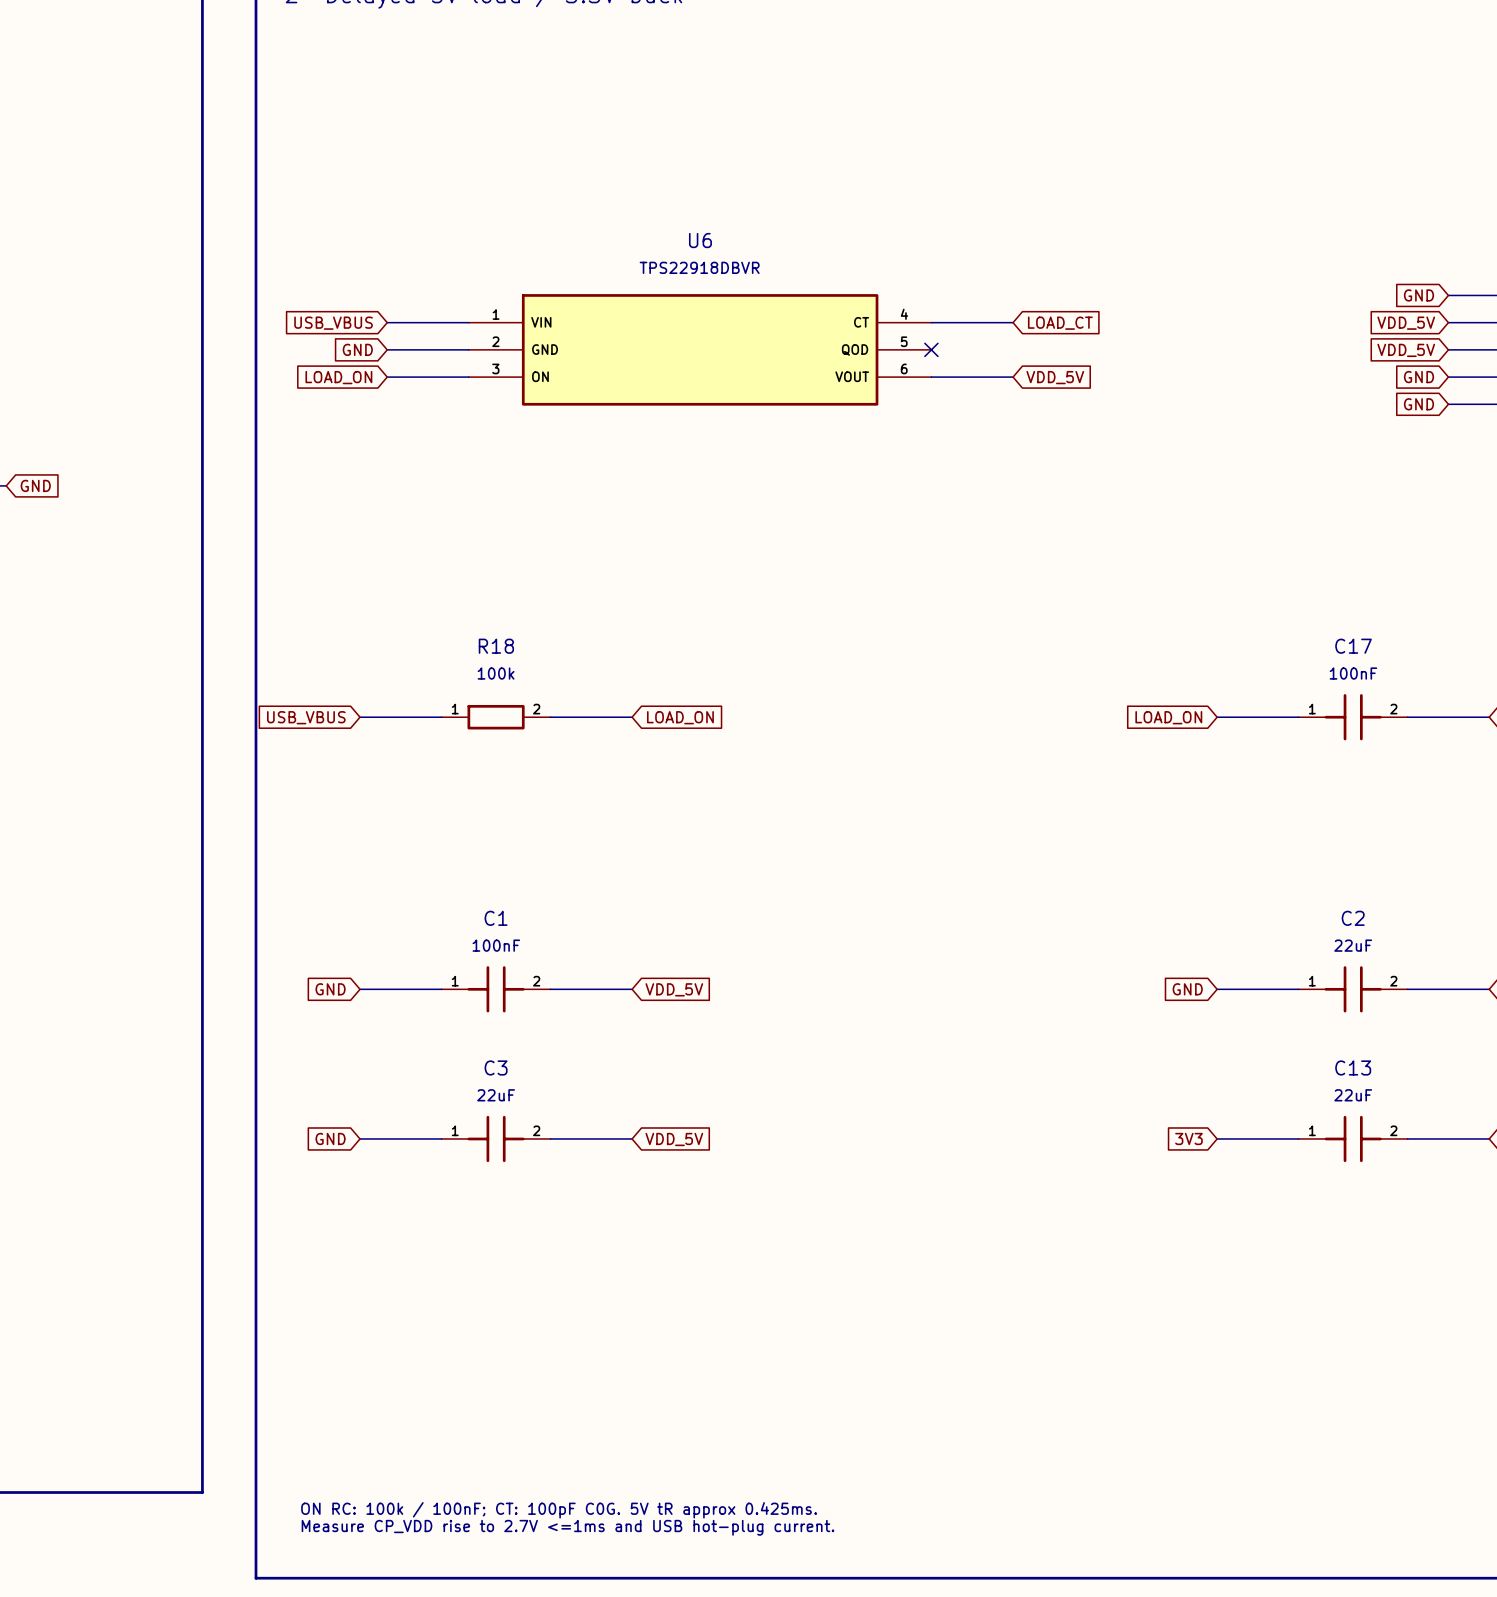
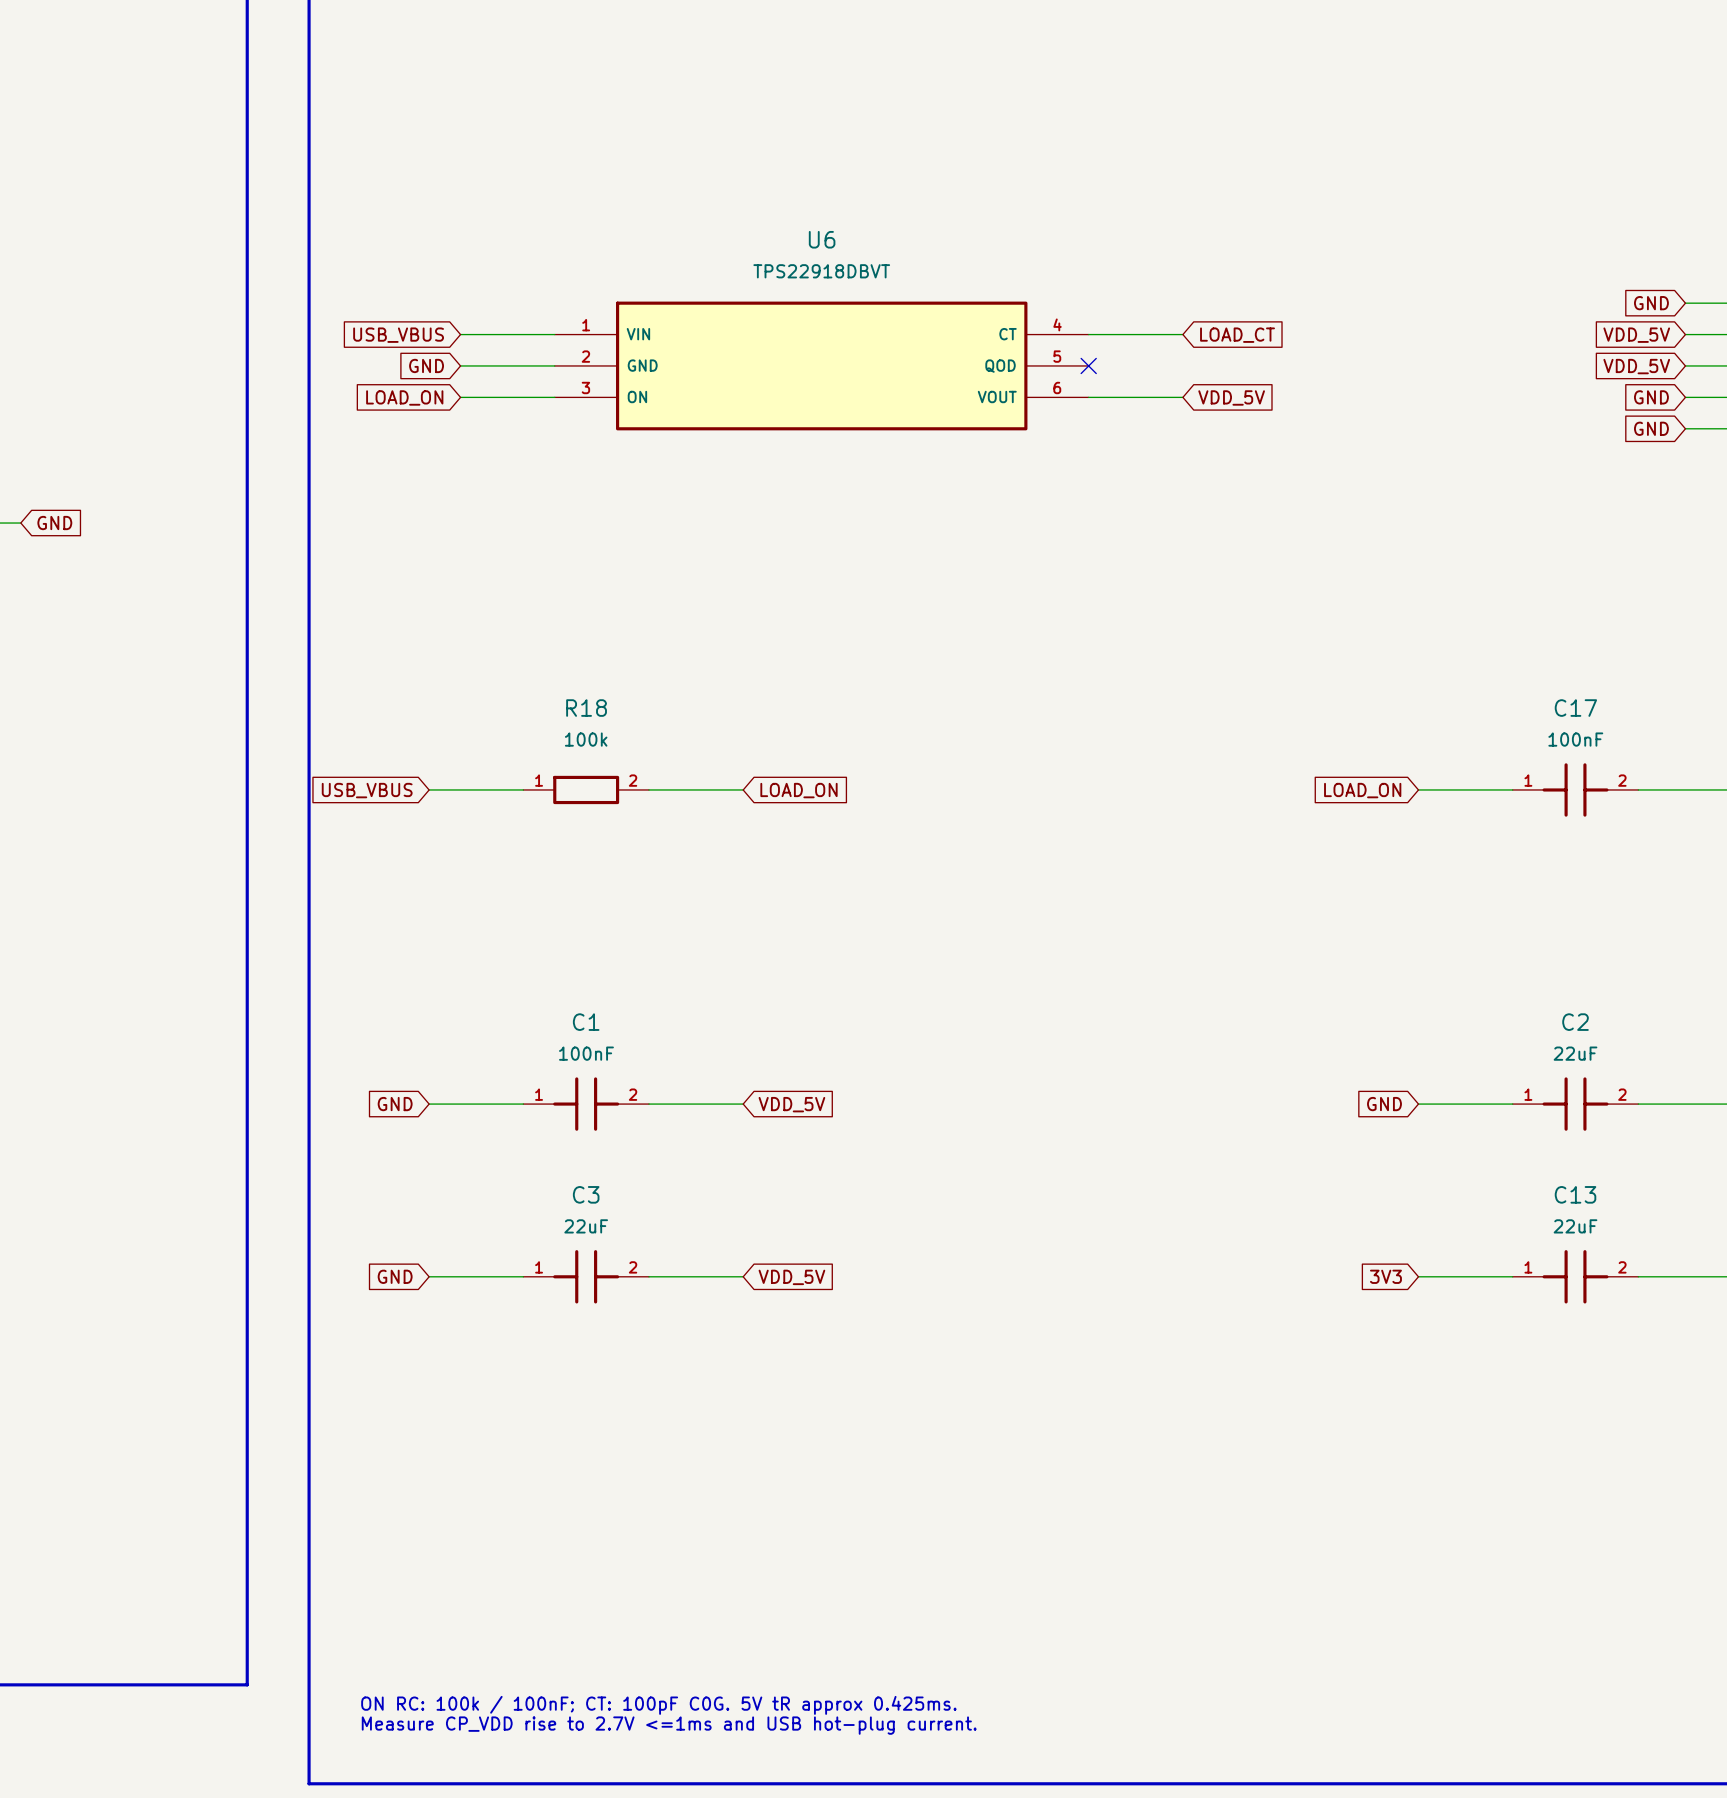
U6 value: TPS22918DBVR (699, 267) -> TPS22918DBVT (821, 271)

